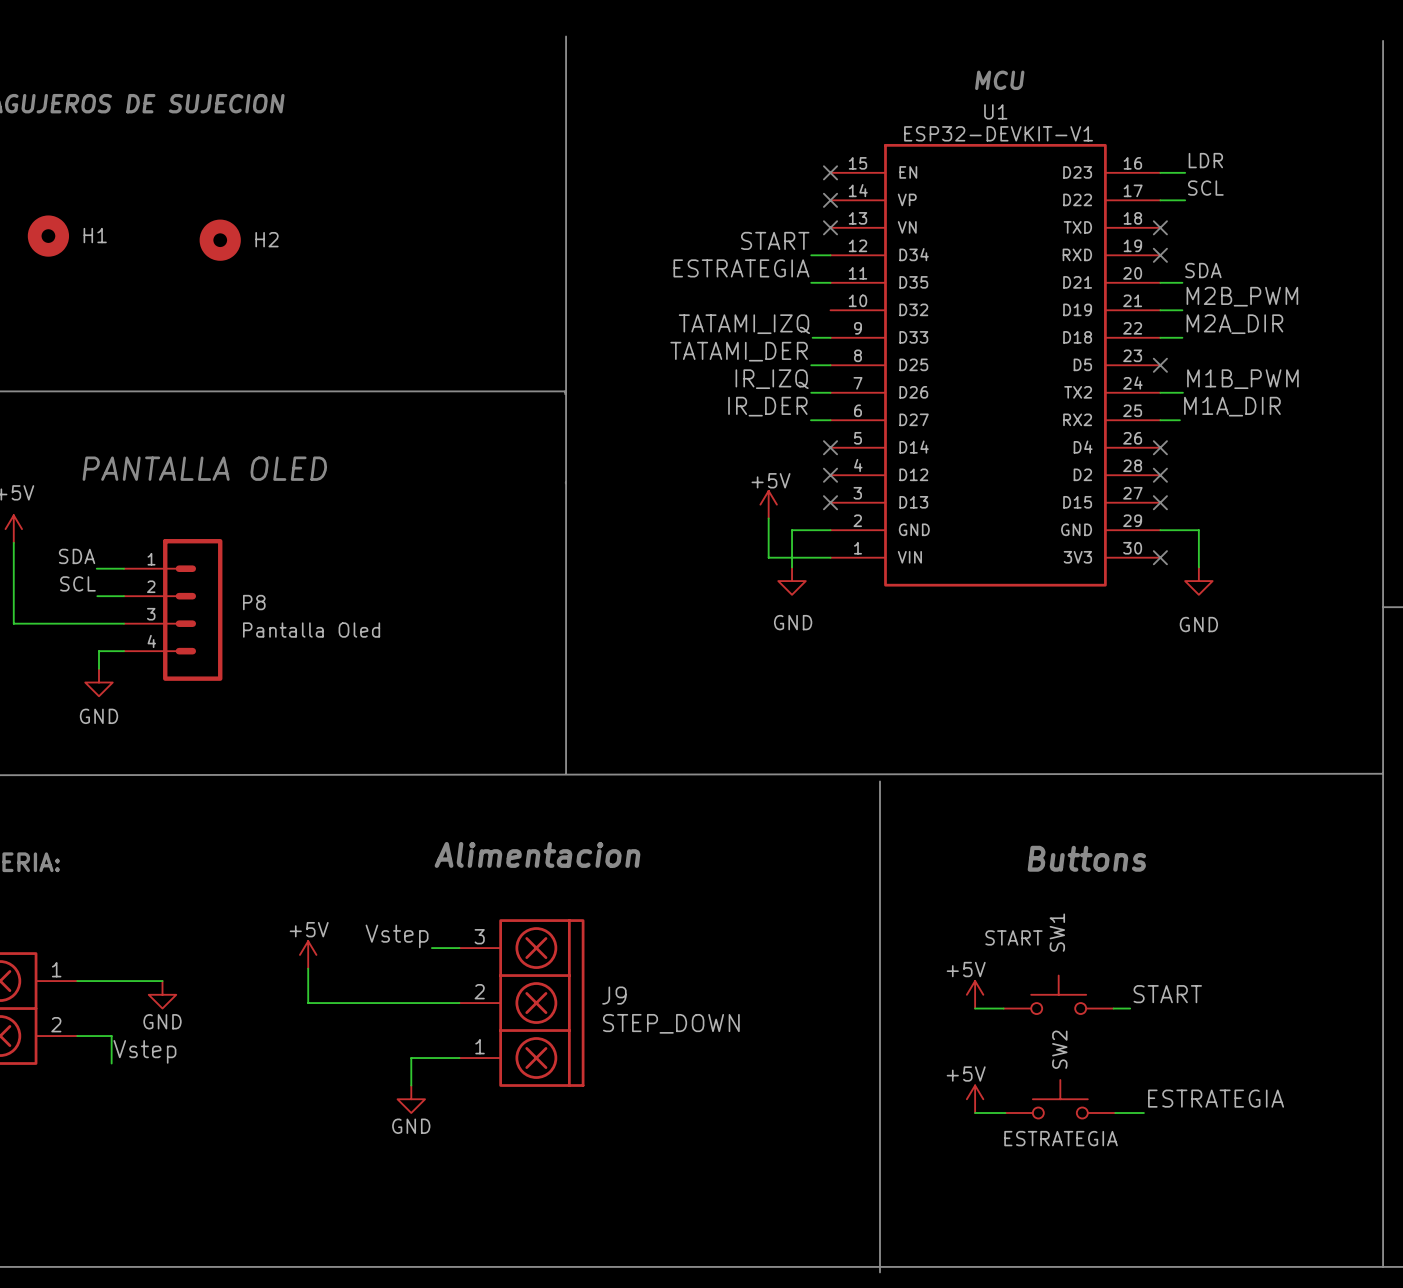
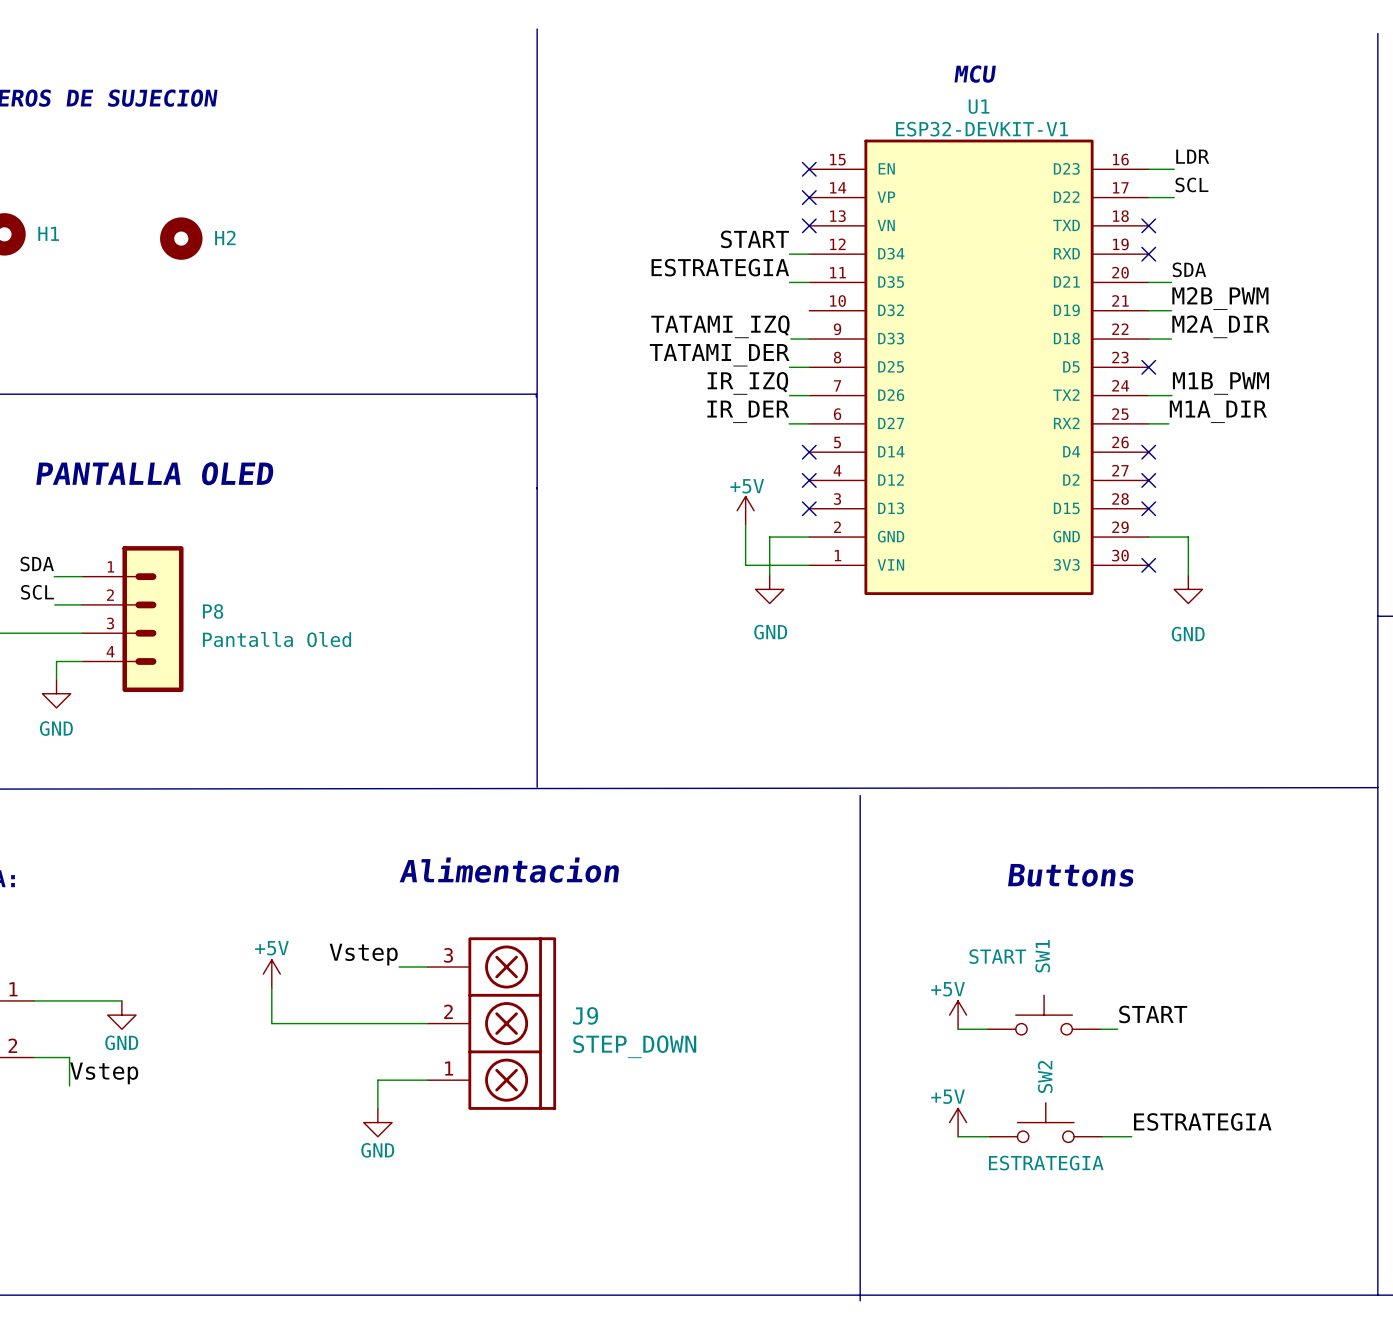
U1 pin number: 28 (1132, 465) -> 27 (1120, 470)
U1 pin number: 27 (1132, 493) -> 28 (1120, 499)

